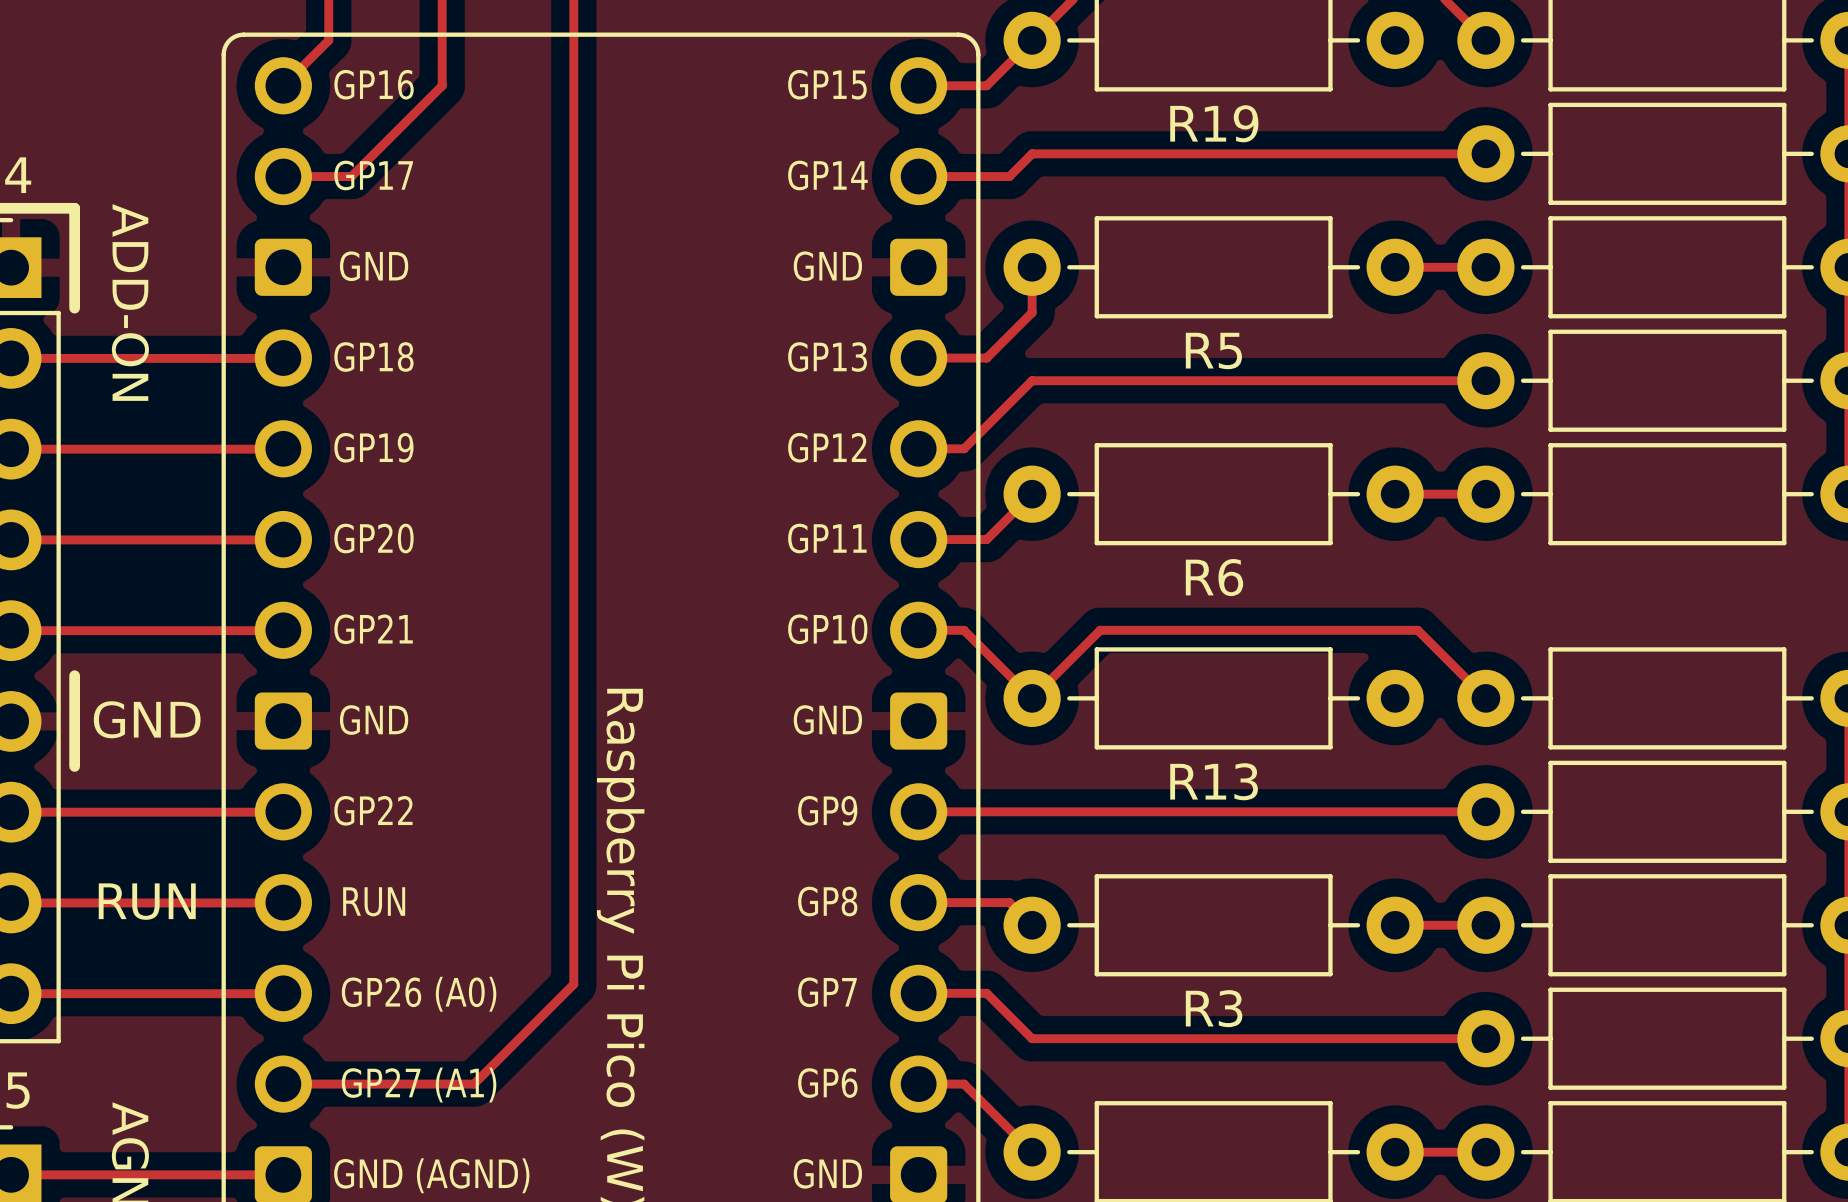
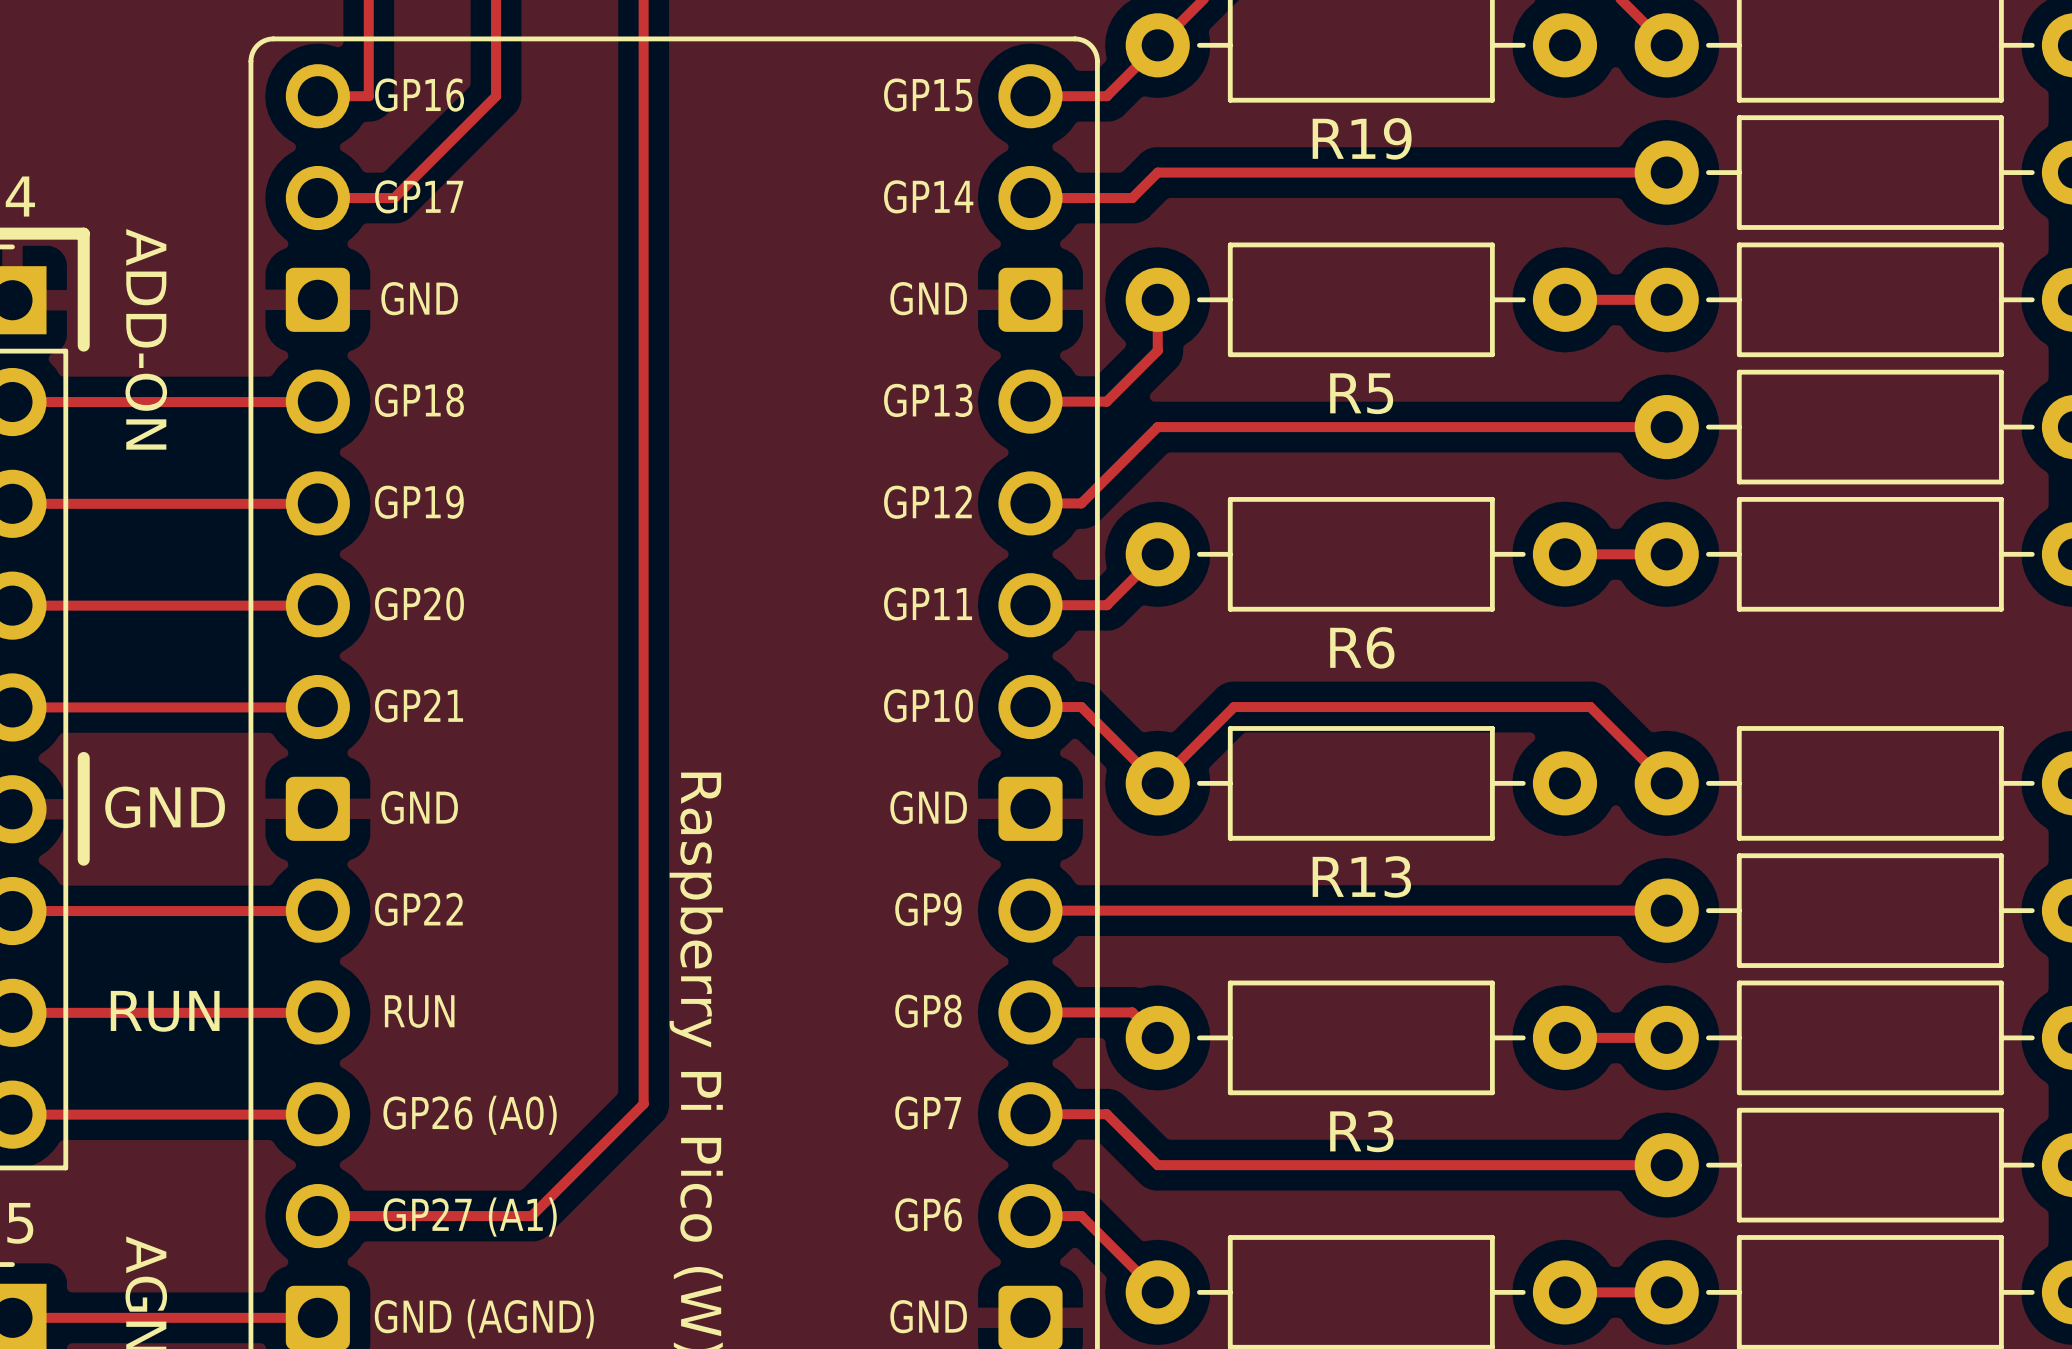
track: (328, 40) (283, 85) -> (368, 45) (368, 96) (317, 96)

